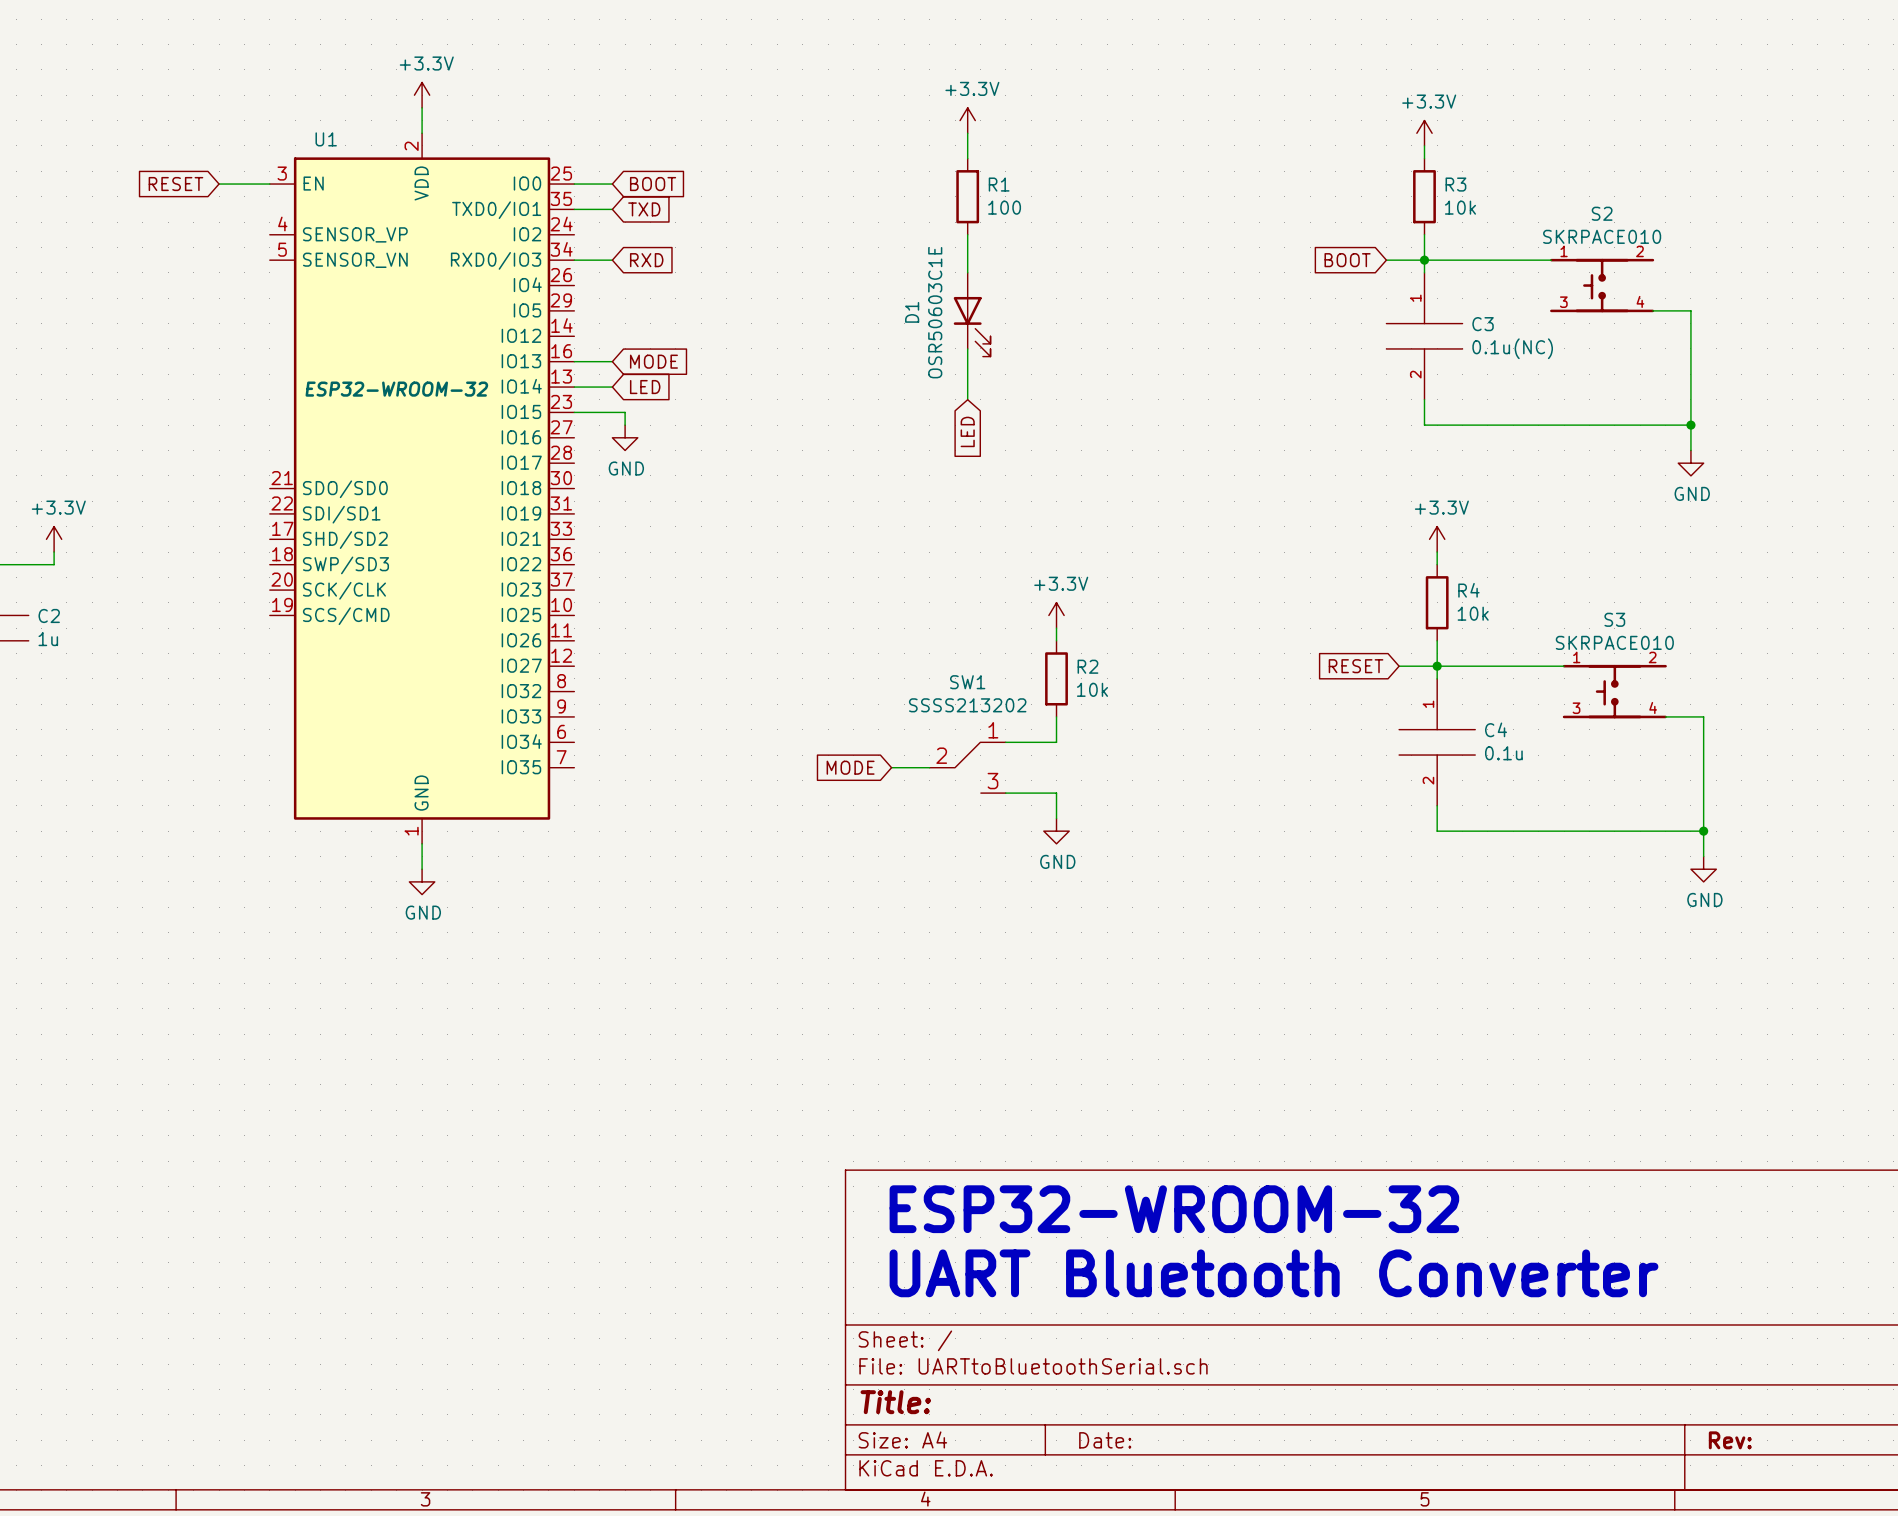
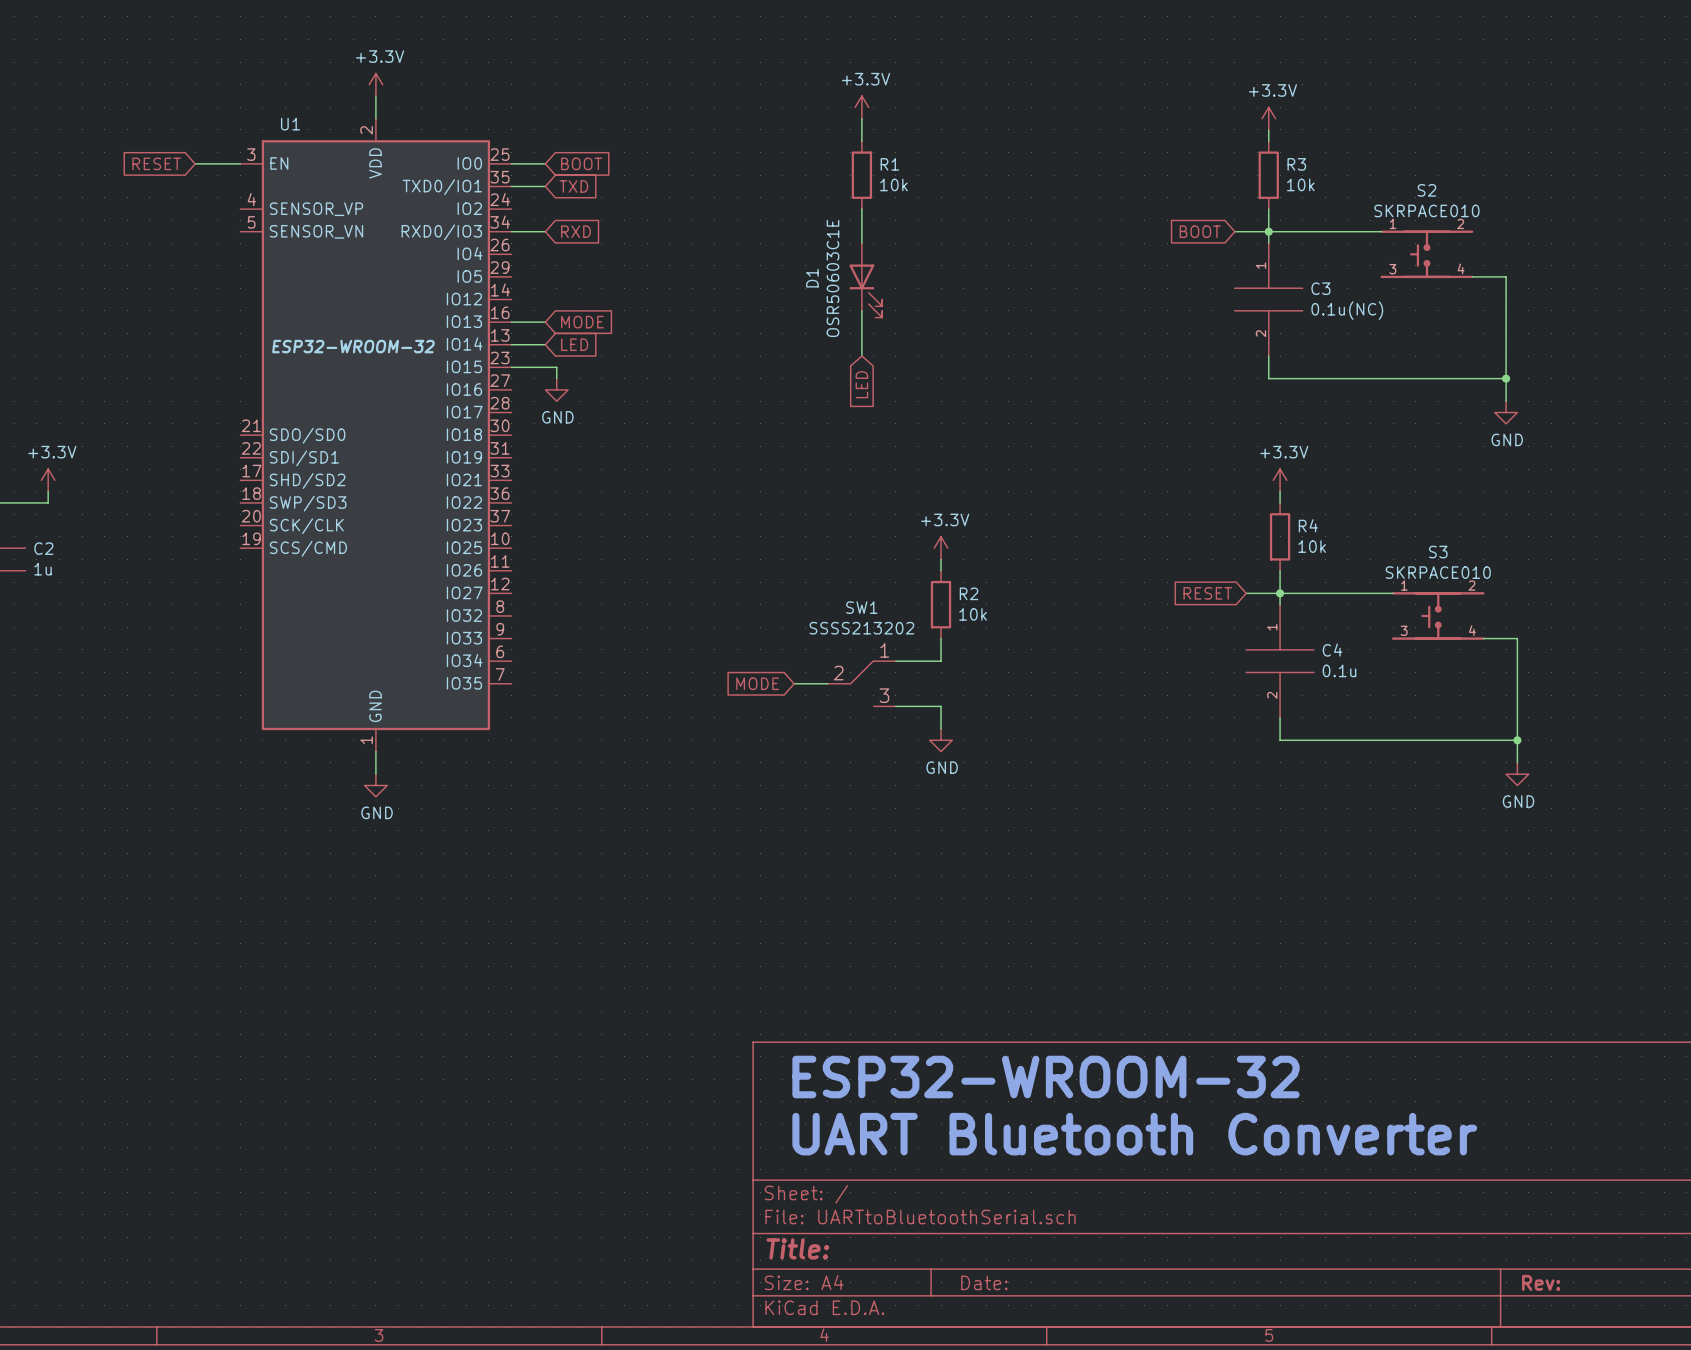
R1 value: 100 (1004, 207) -> 10k (893, 184)

